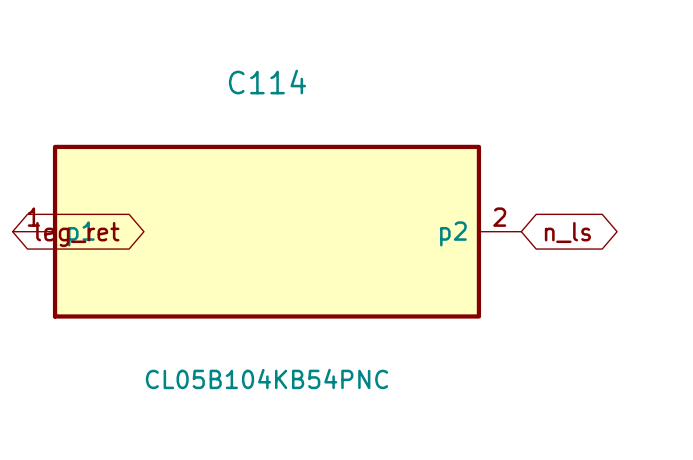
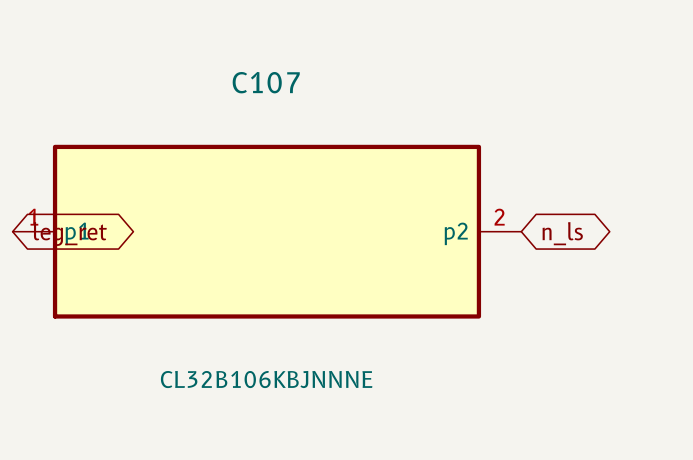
C114 name: C114 (267, 82) -> C107 (266, 82)
C114 value: CL05B104KB54PNC (266, 379) -> CL32B106KBJNNNE (266, 379)

